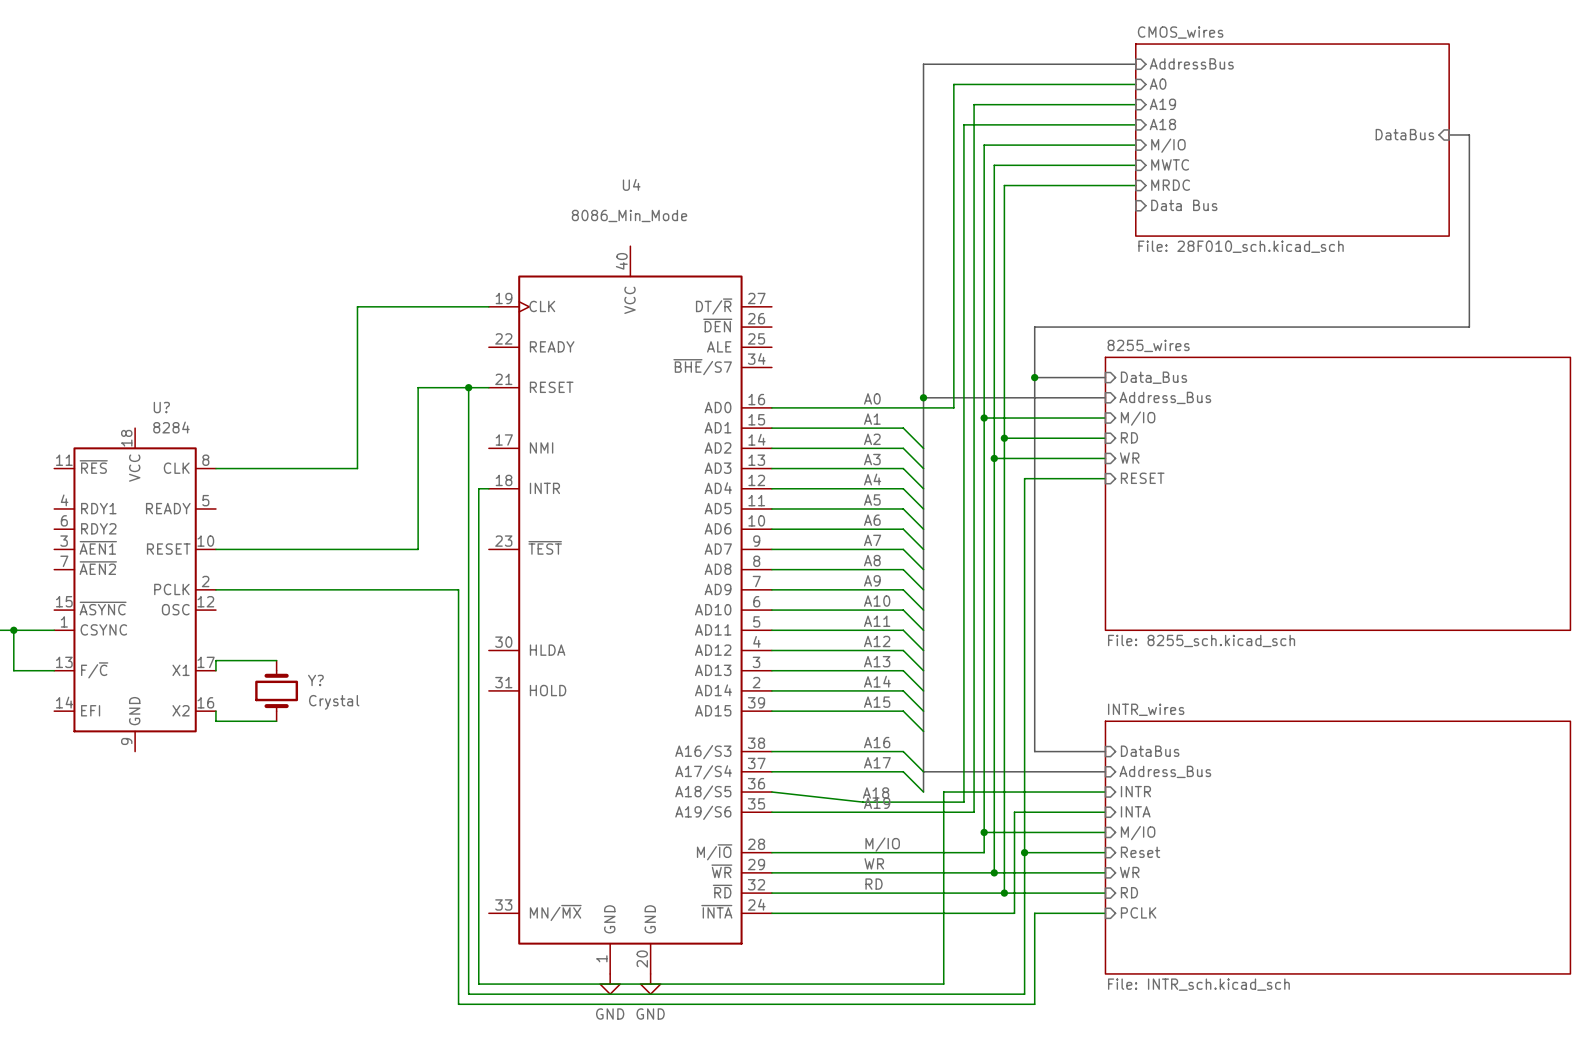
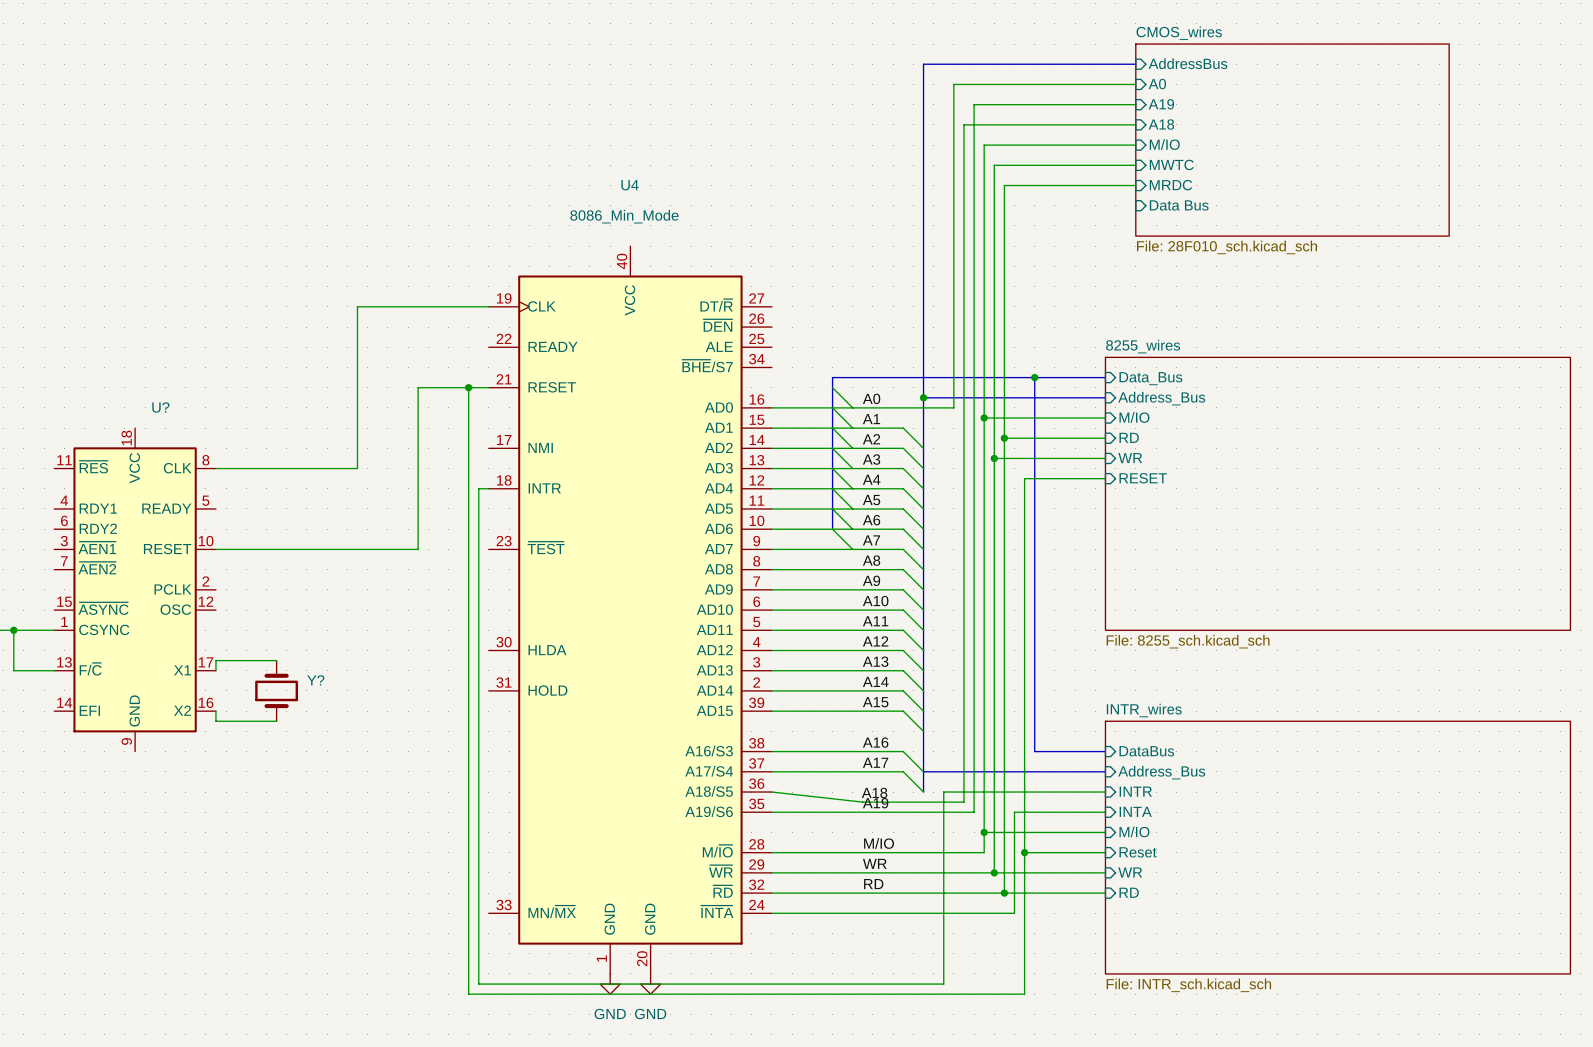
sheet pin: DataBus (1404, 134) -> none
bus: (1449, 134) (1469, 134) (1469, 327) (1034, 327) (1034, 377) -> (832, 529) (832, 377) (1034, 377)
wire: none -> (832, 387) (852, 407)
wire: none -> (832, 407) (852, 428)
U? value: 8284 (171, 427) -> none
wire: none -> (832, 428) (852, 448)
wire: none -> (832, 448) (852, 468)
wire: none -> (832, 468) (852, 488)
wire: none -> (832, 488) (852, 508)
wire: none -> (832, 508) (852, 529)
wire: none -> (832, 529) (852, 549)
wire: (215, 589) (458, 589) (458, 1004) (1034, 1004) (1034, 913) (1105, 913) -> none
Y? value: Crystal (334, 702) -> none
sheet pin: PCLK (1138, 912) -> none

